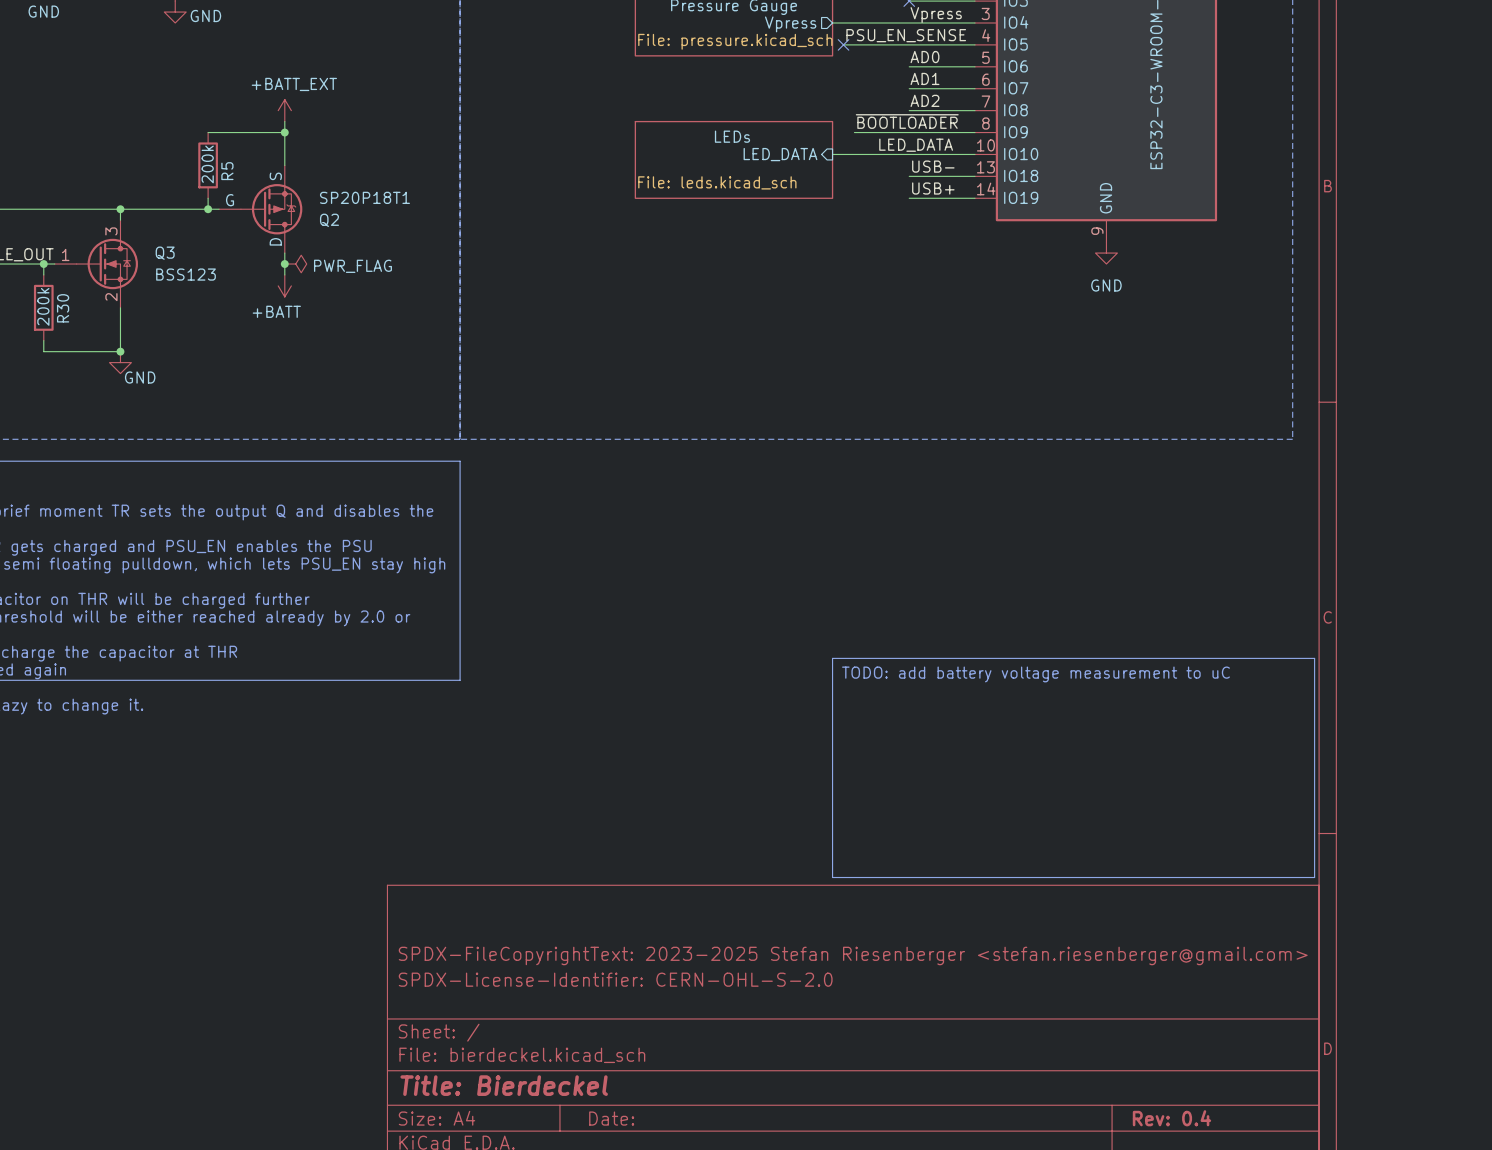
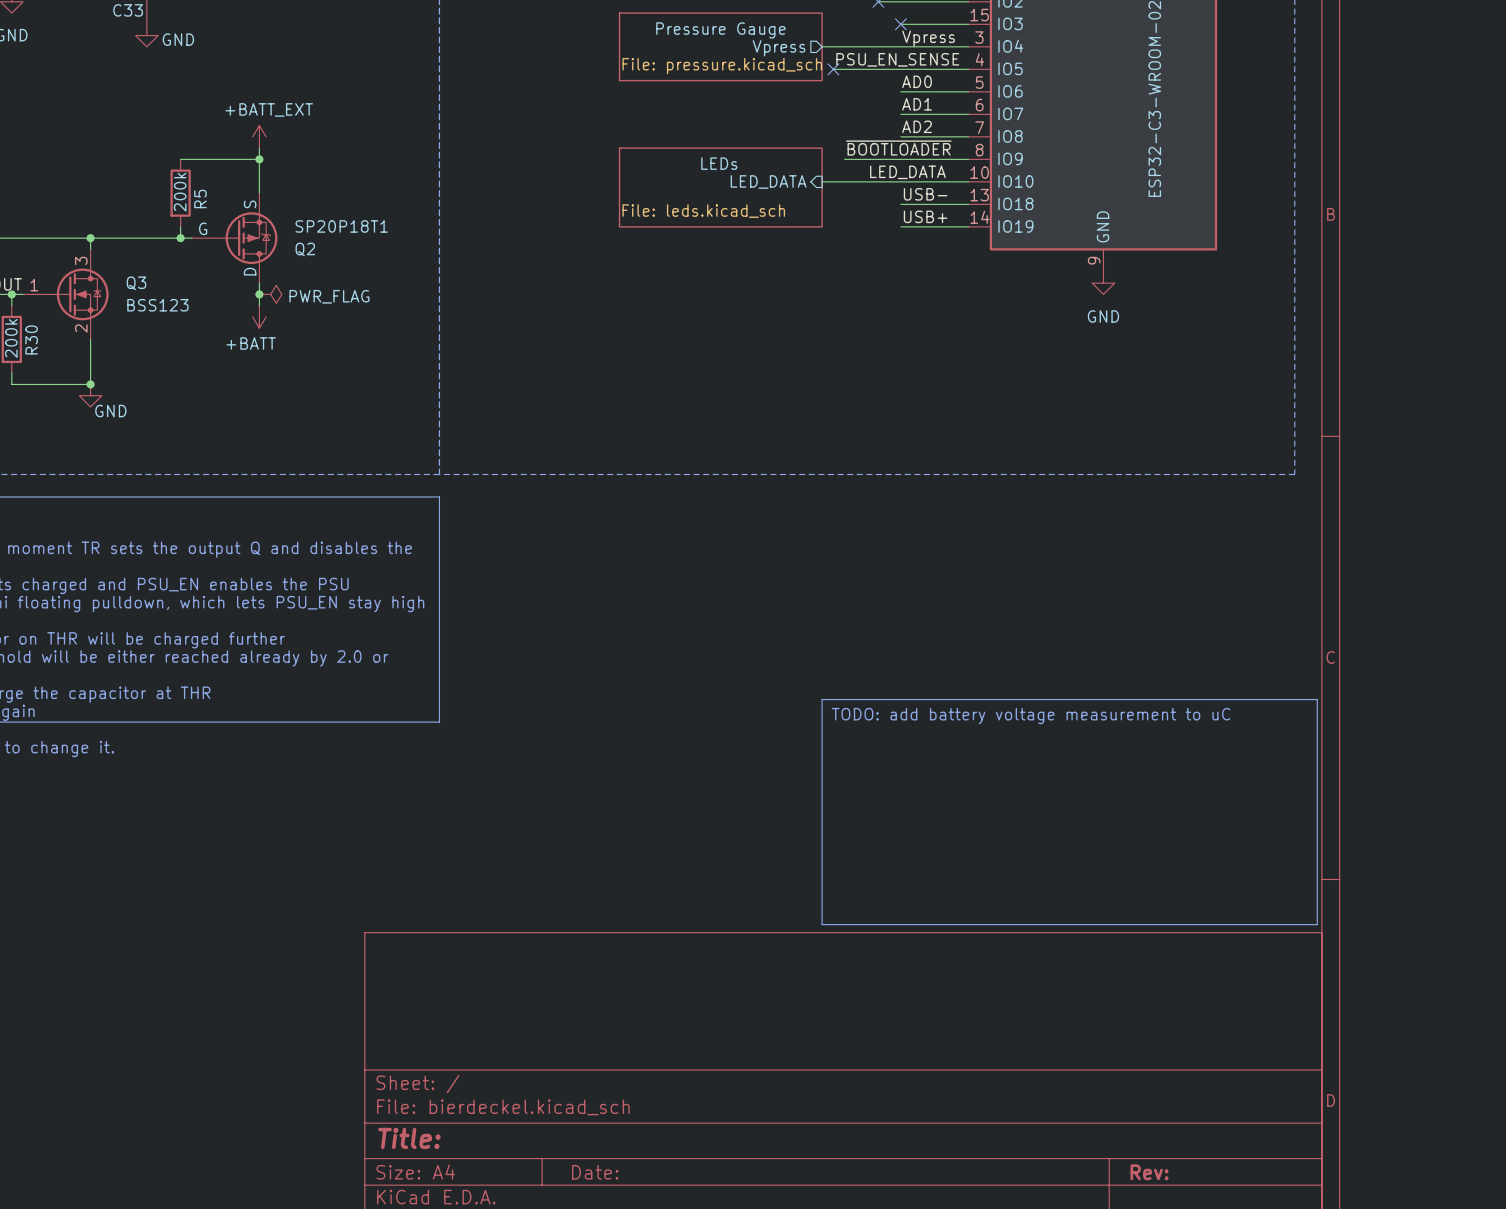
title block: SPDX-FileCopyrightText: 2023-2025 Stefan Riesenberger <stefan.riesenberger@gmail.com> (853, 955) -> none
title block: SPDX-License-Identifier: CERN-OHL-S-2.0 (615, 979) -> none
title block: Title: Bierdeckel (504, 1085) -> Title: (409, 1138)
title block: Rev: 0.4 (1171, 1118) -> Rev: (1149, 1172)

